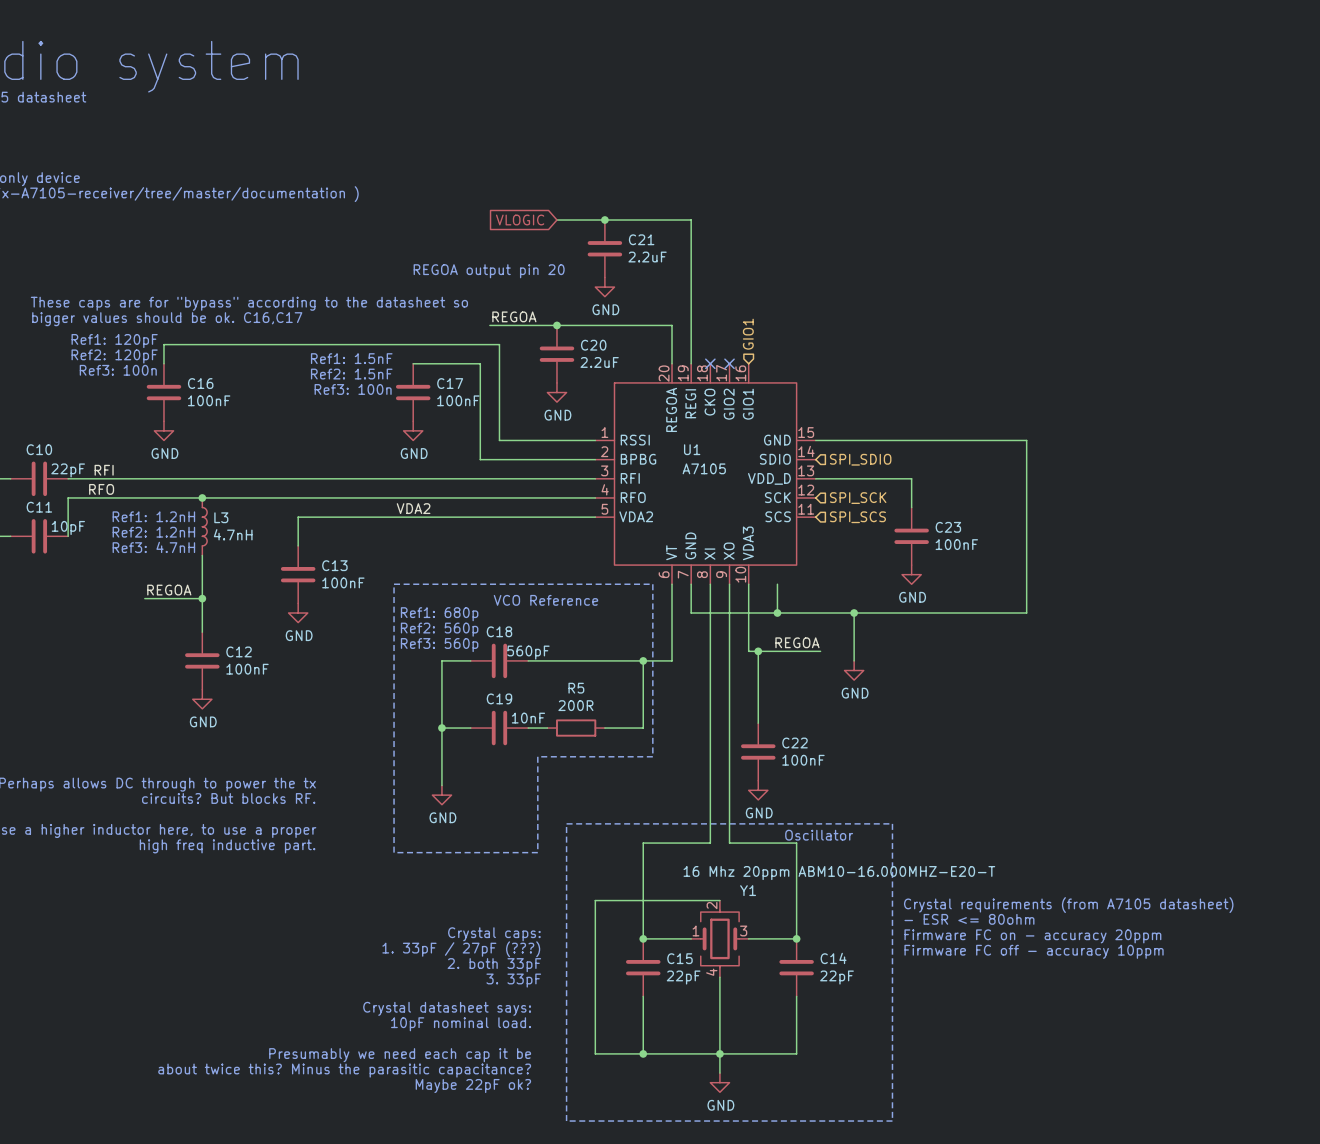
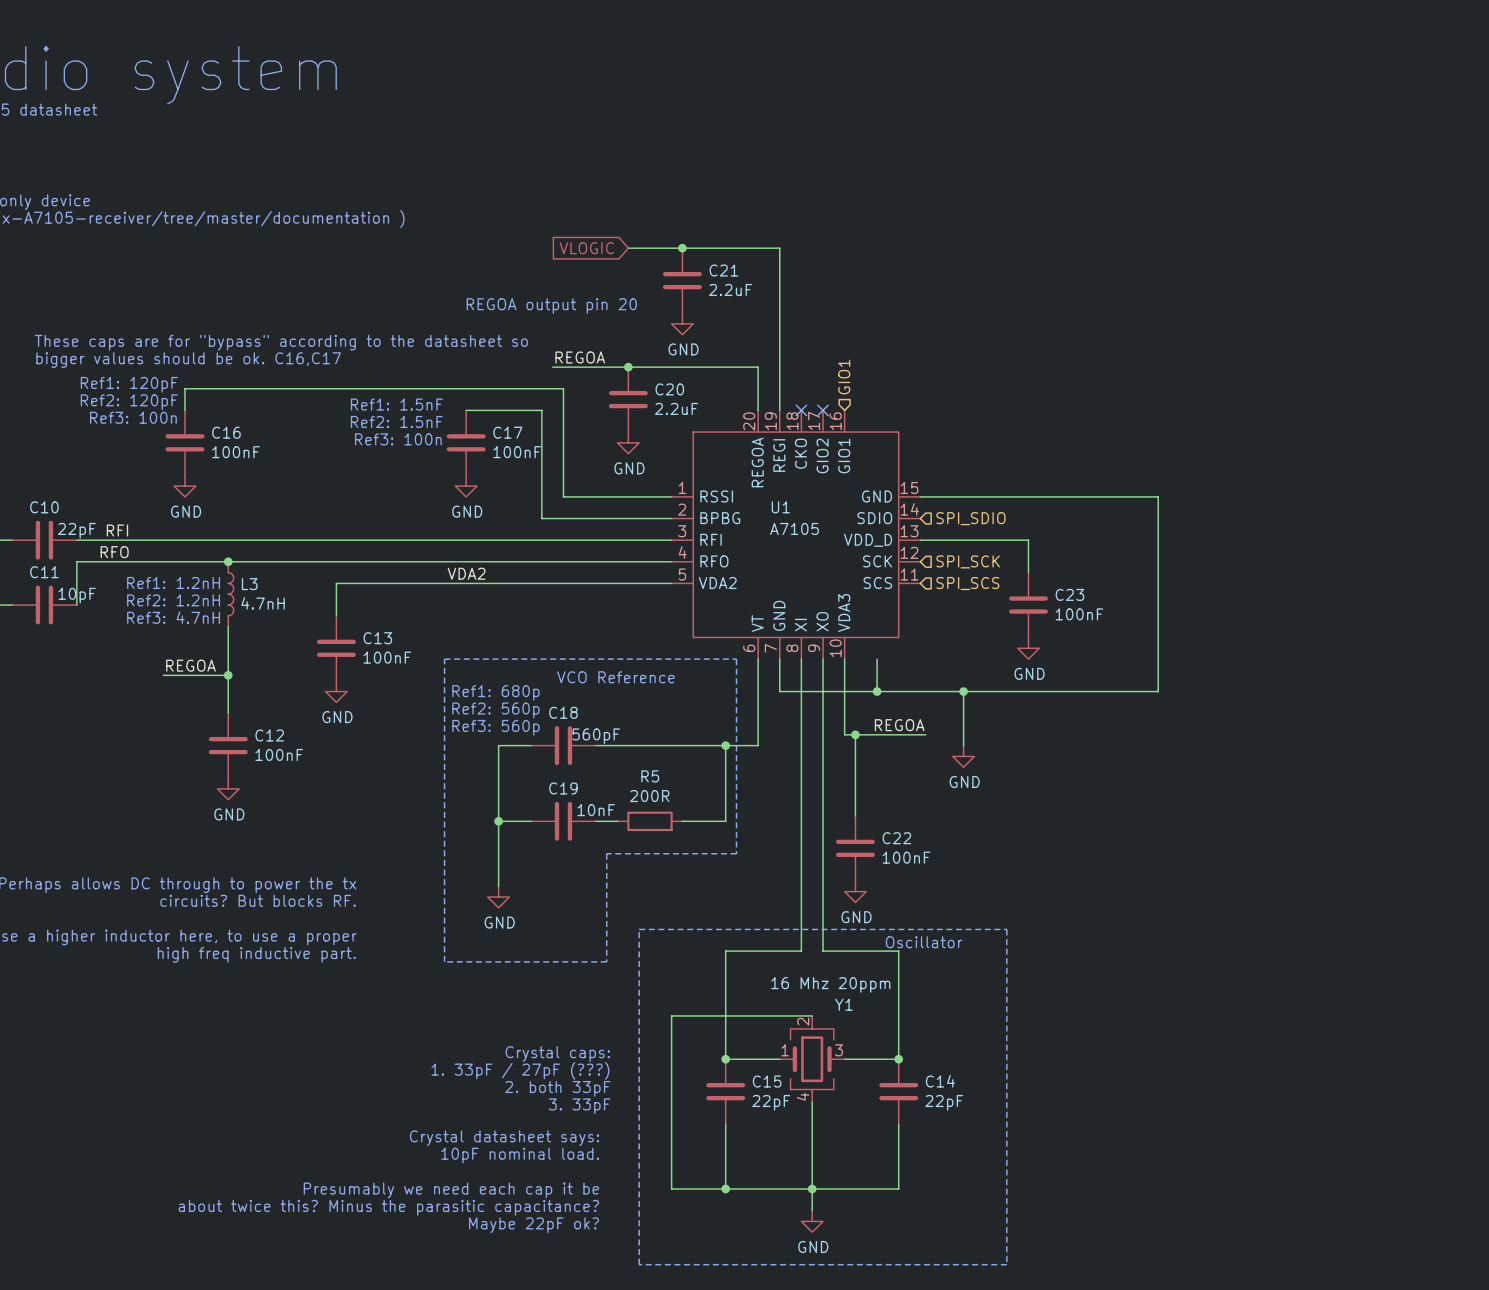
Y1 value: 16 Mhz 20ppm ABM10-16.000MHZ-E20-T (839, 873) -> 16 Mhz 20ppm (830, 984)
text: Crystal requirements (from A7105 datasheet) (1068, 905) -> none
text: - ESR <= 80ohm (969, 919) -> none
text: Firmware FC on - accuracy 20ppm (1032, 936) -> none
text: Firmware FC off - accuracy 10ppm (1034, 951) -> none

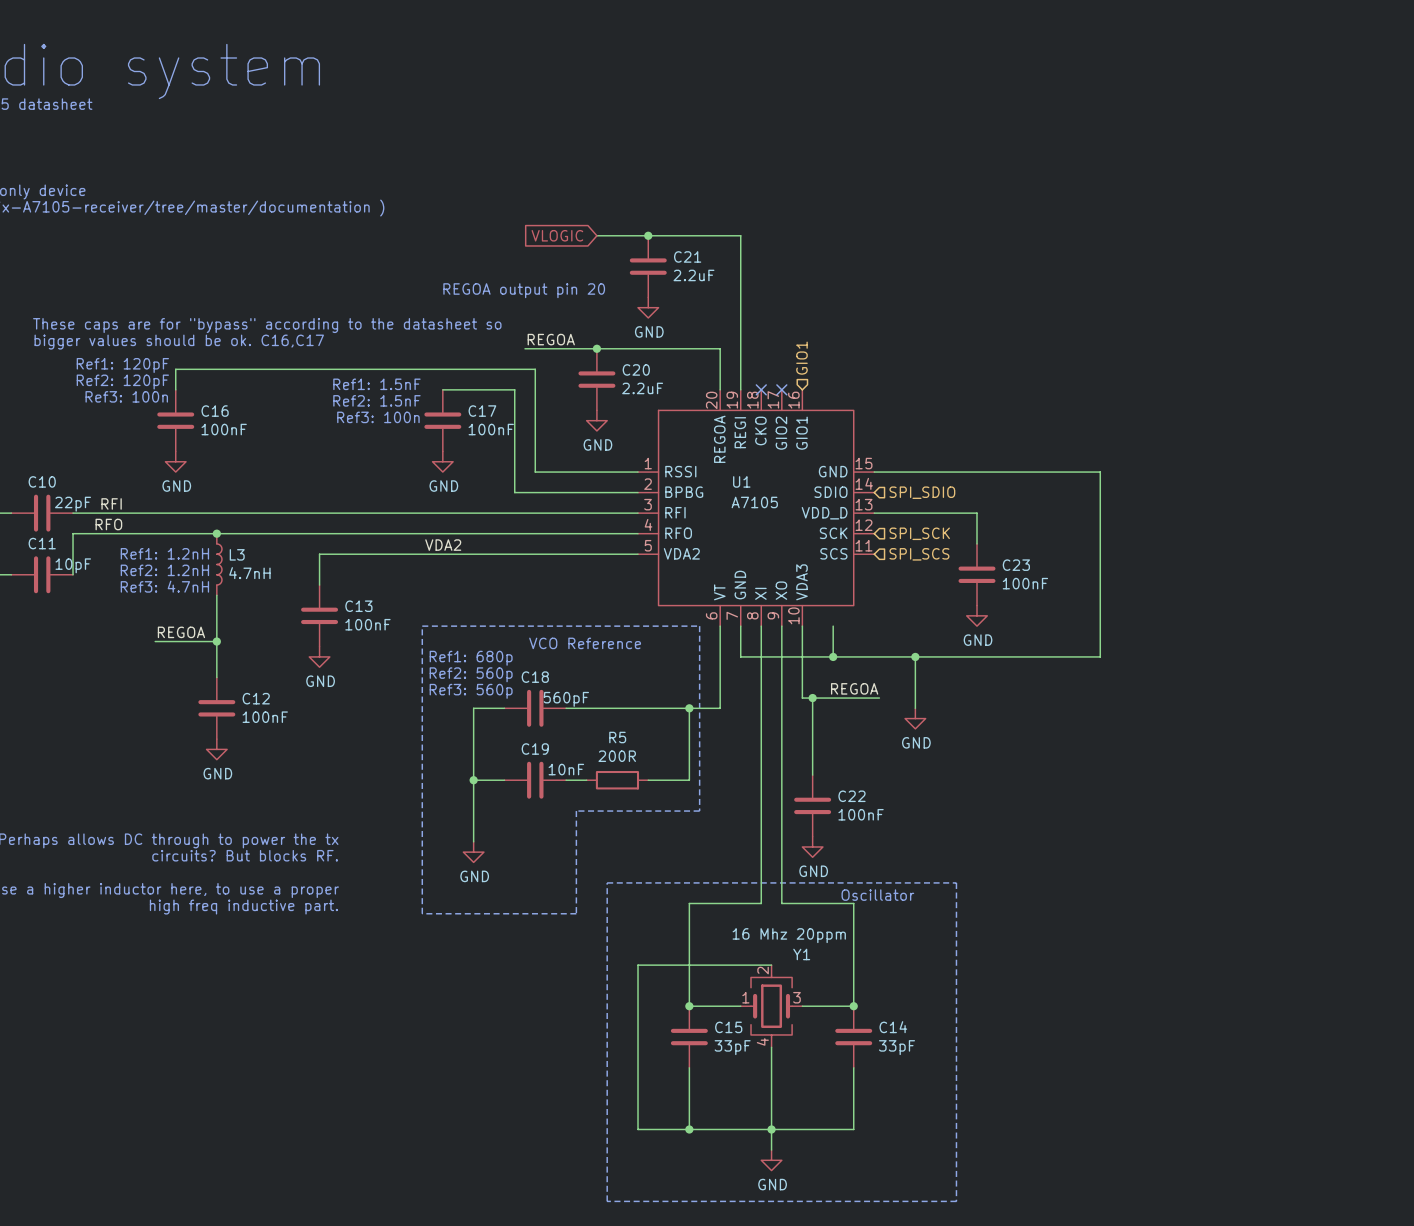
text: Crystal caps: (557, 1054) -> none
text: 1. 33pF / 27pF (???) (520, 1070) -> none
text: 2. both 33pF (557, 1088) -> none
C15 value: 22pF (771, 1102) -> 33pF (732, 1047)
C14 value: 22pF (944, 1102) -> 33pF (897, 1047)
text: 3. 33pF (579, 1106) -> none
text: Crystal datasheet says: (504, 1138) -> none
text: 10pF nominal load. (520, 1155) -> none
text: Presumably we need each cap it be (451, 1190) -> none
text: about twice this? Minus the parasitic capacitance? (388, 1207) -> none
text: Maybe 22pF ok? (534, 1225) -> none

